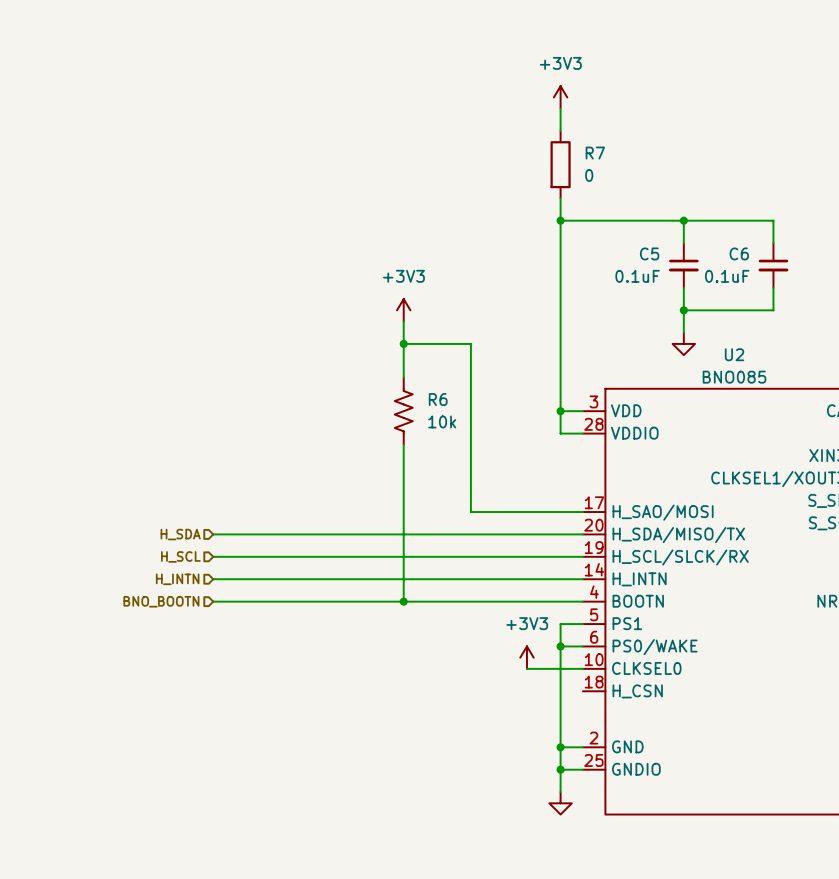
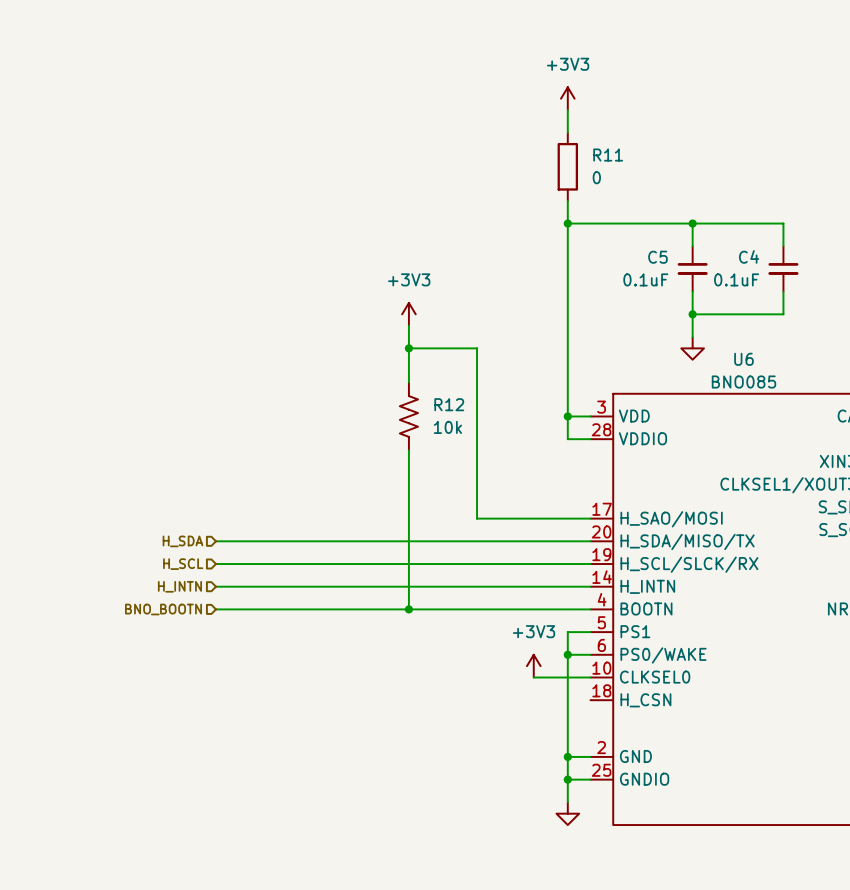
R7 name: R7 (595, 153) -> R11 (608, 155)
C6 name: C6 (739, 253) -> C4 (749, 256)
U2 name: U2 (734, 354) -> U6 (743, 359)
R6 name: R6 (438, 399) -> R12 (449, 404)

